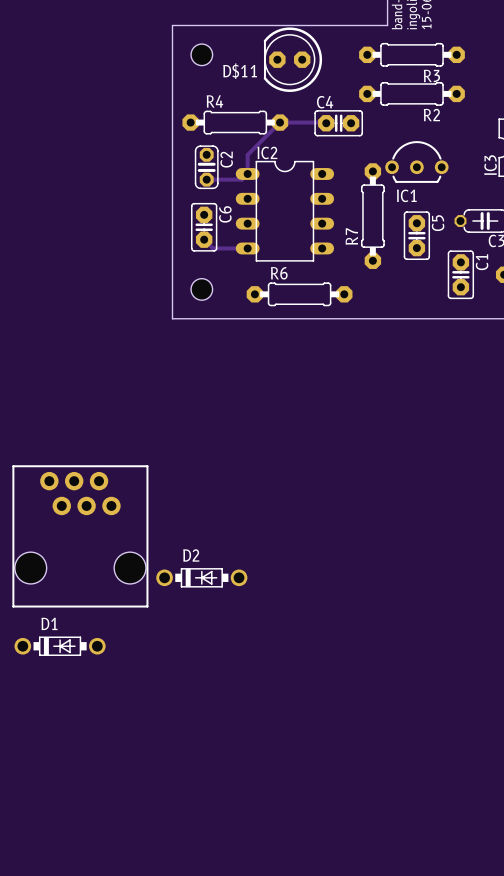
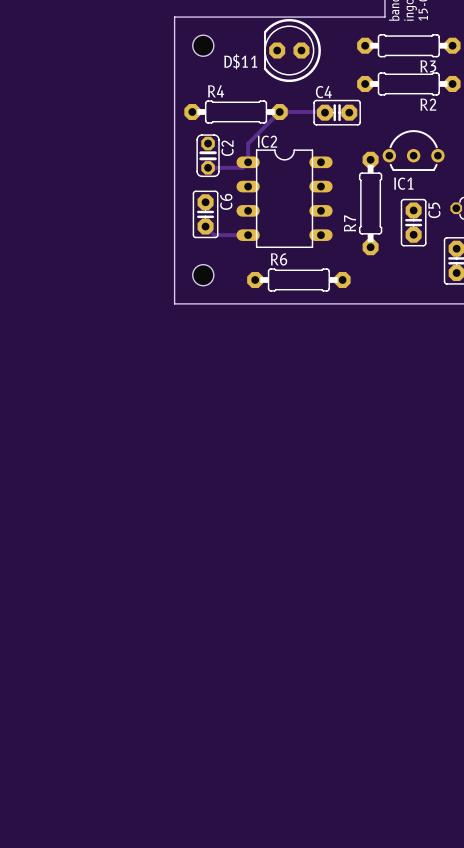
part: (80, 536) -> none
D2: (201, 577) -> none
D1: (60, 646) -> none

